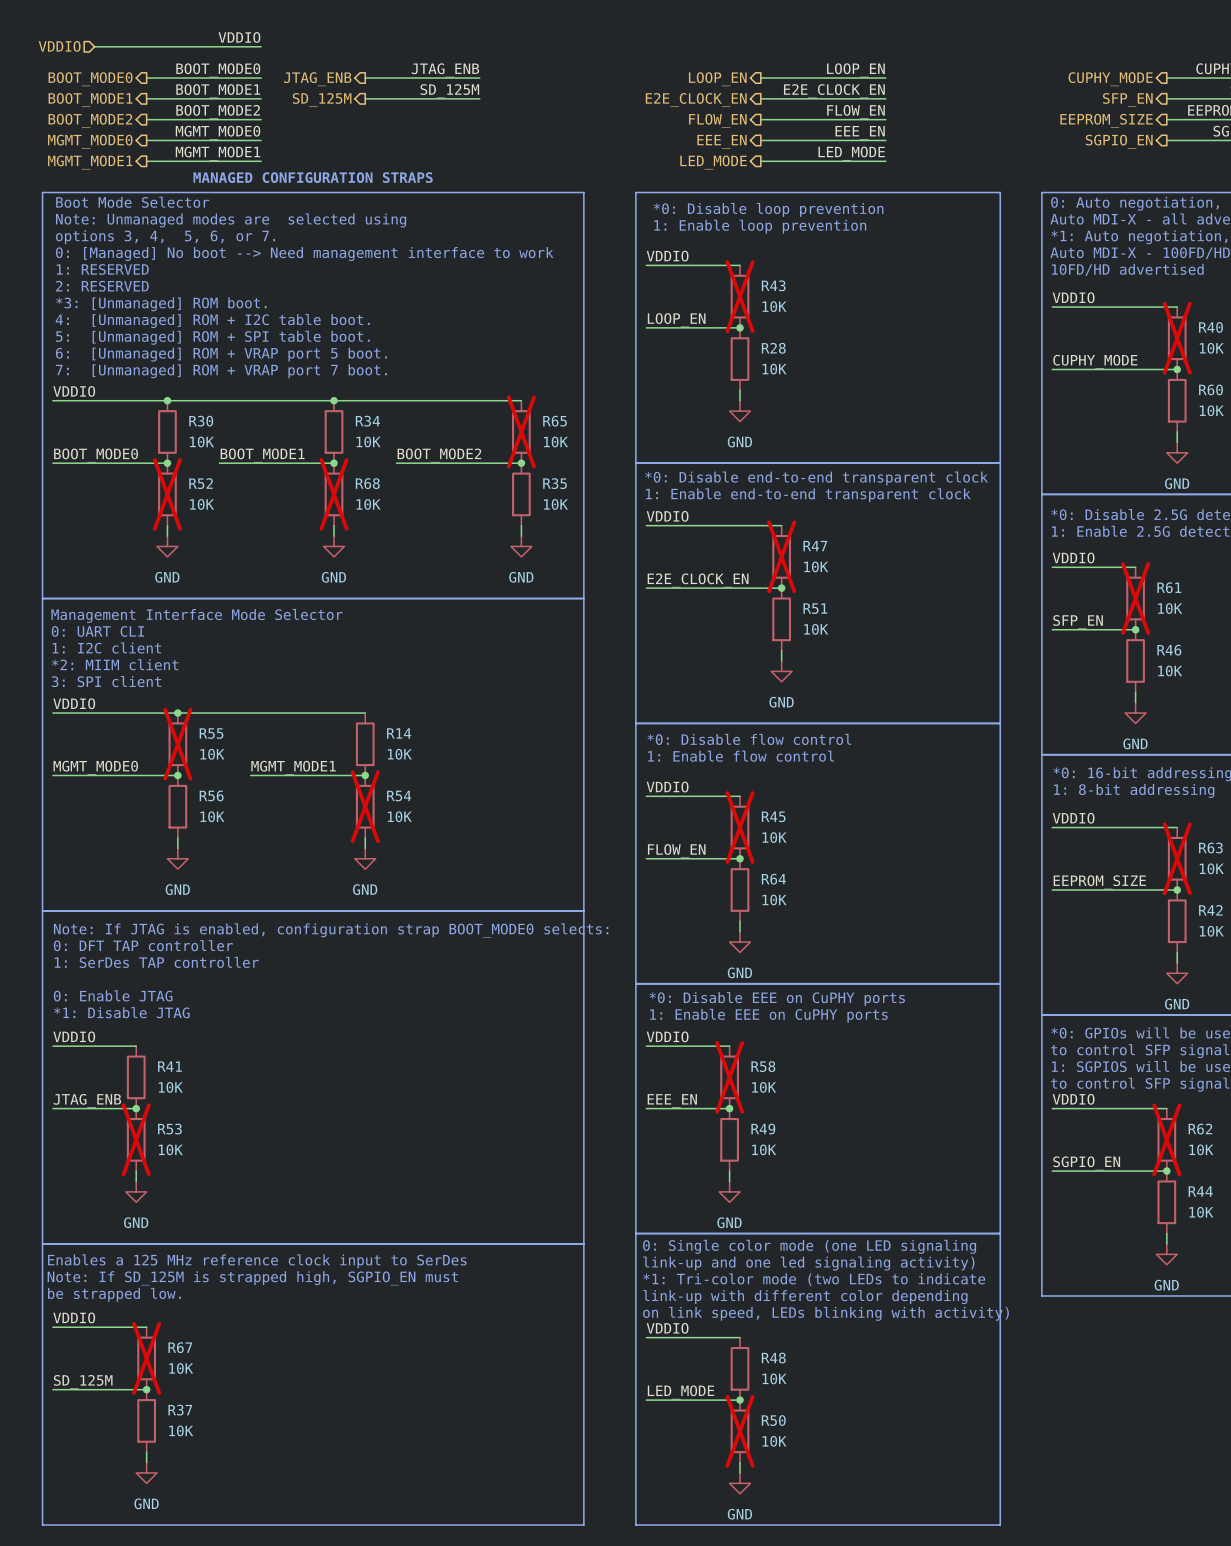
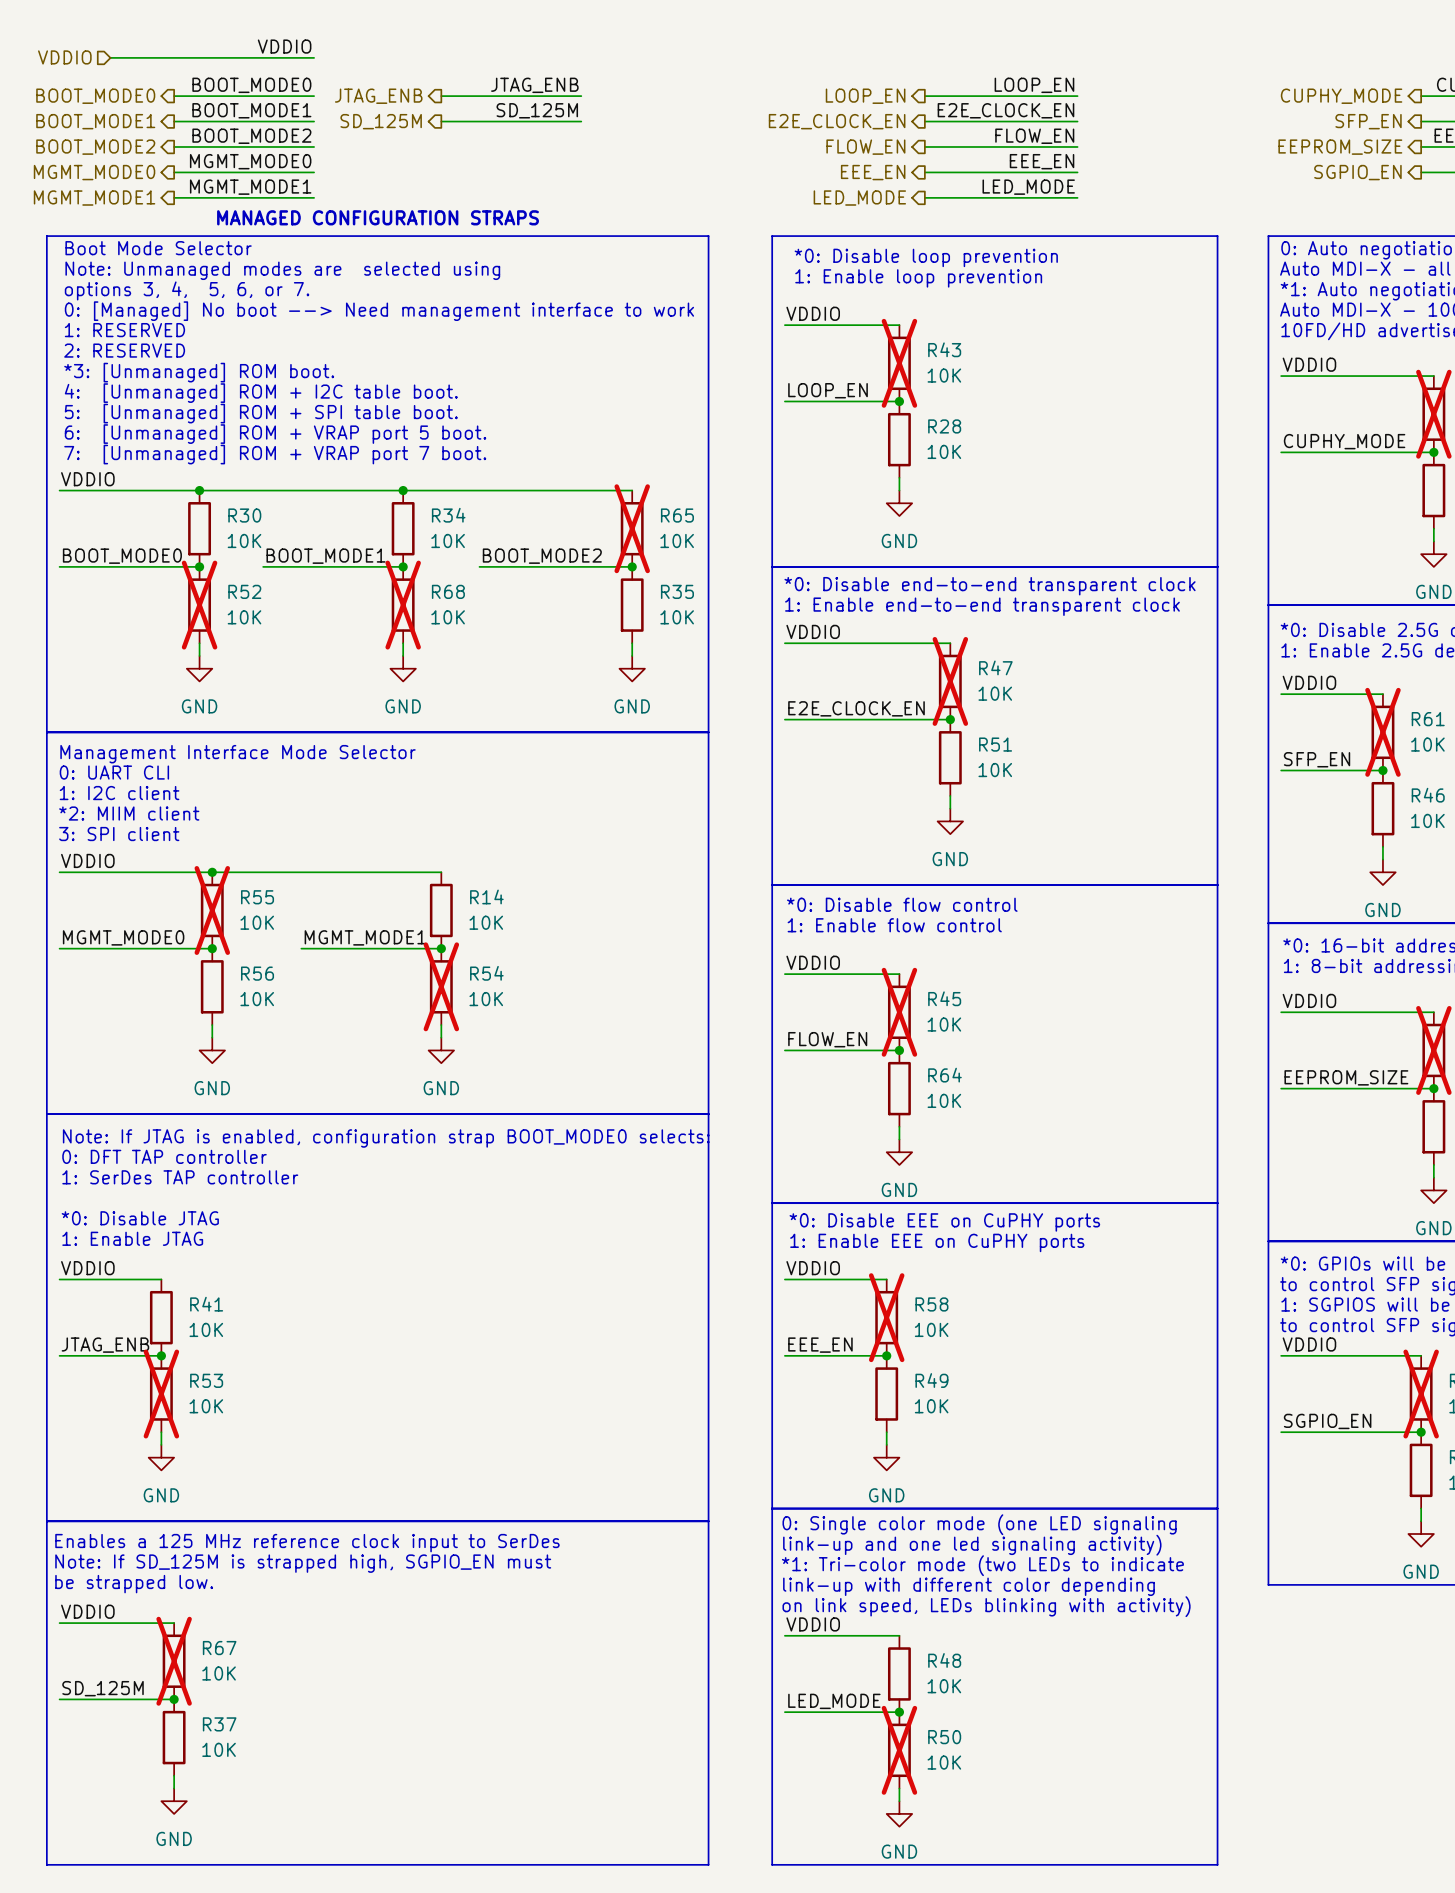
text: 0: Enable JTAG (113, 995) -> *0: Disable JTAG (140, 1218)
text: *1: Disable JTAG (121, 1012) -> 1: Enable JTAG (132, 1238)

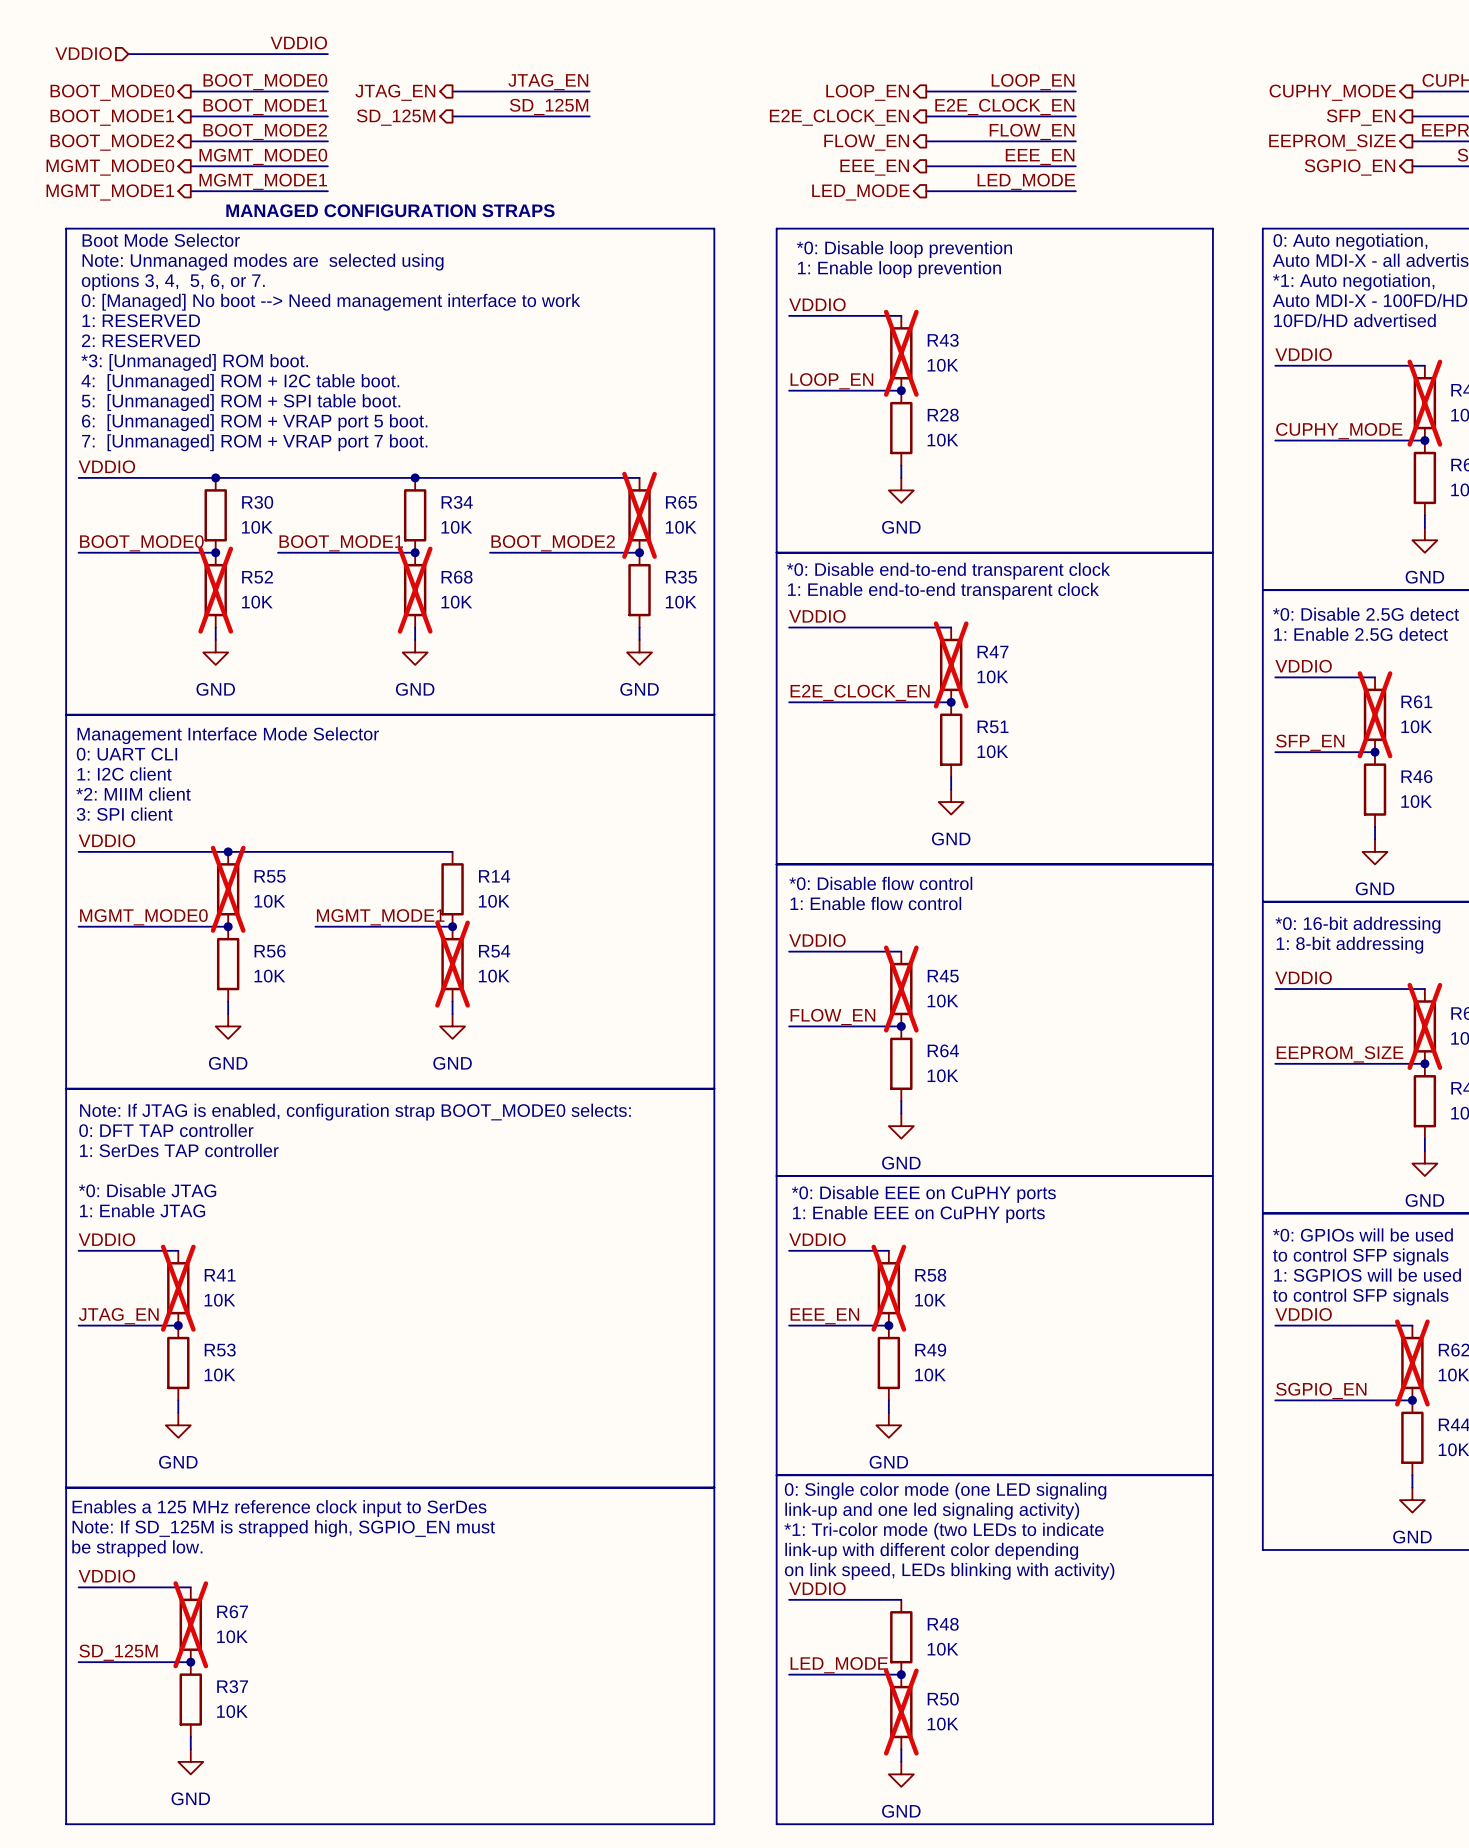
label: JTAG_ENB (534, 85) -> JTAG_EN (548, 82)
hierarchical label: JTAG_ENB (378, 96) -> JTAG_EN (395, 92)
R41 do-not-place cross: none -> (178, 1288)
label: JTAG_ENB (105, 1345) -> JTAG_EN (118, 1316)
R53 do-not-place cross: (161, 1394) -> none

